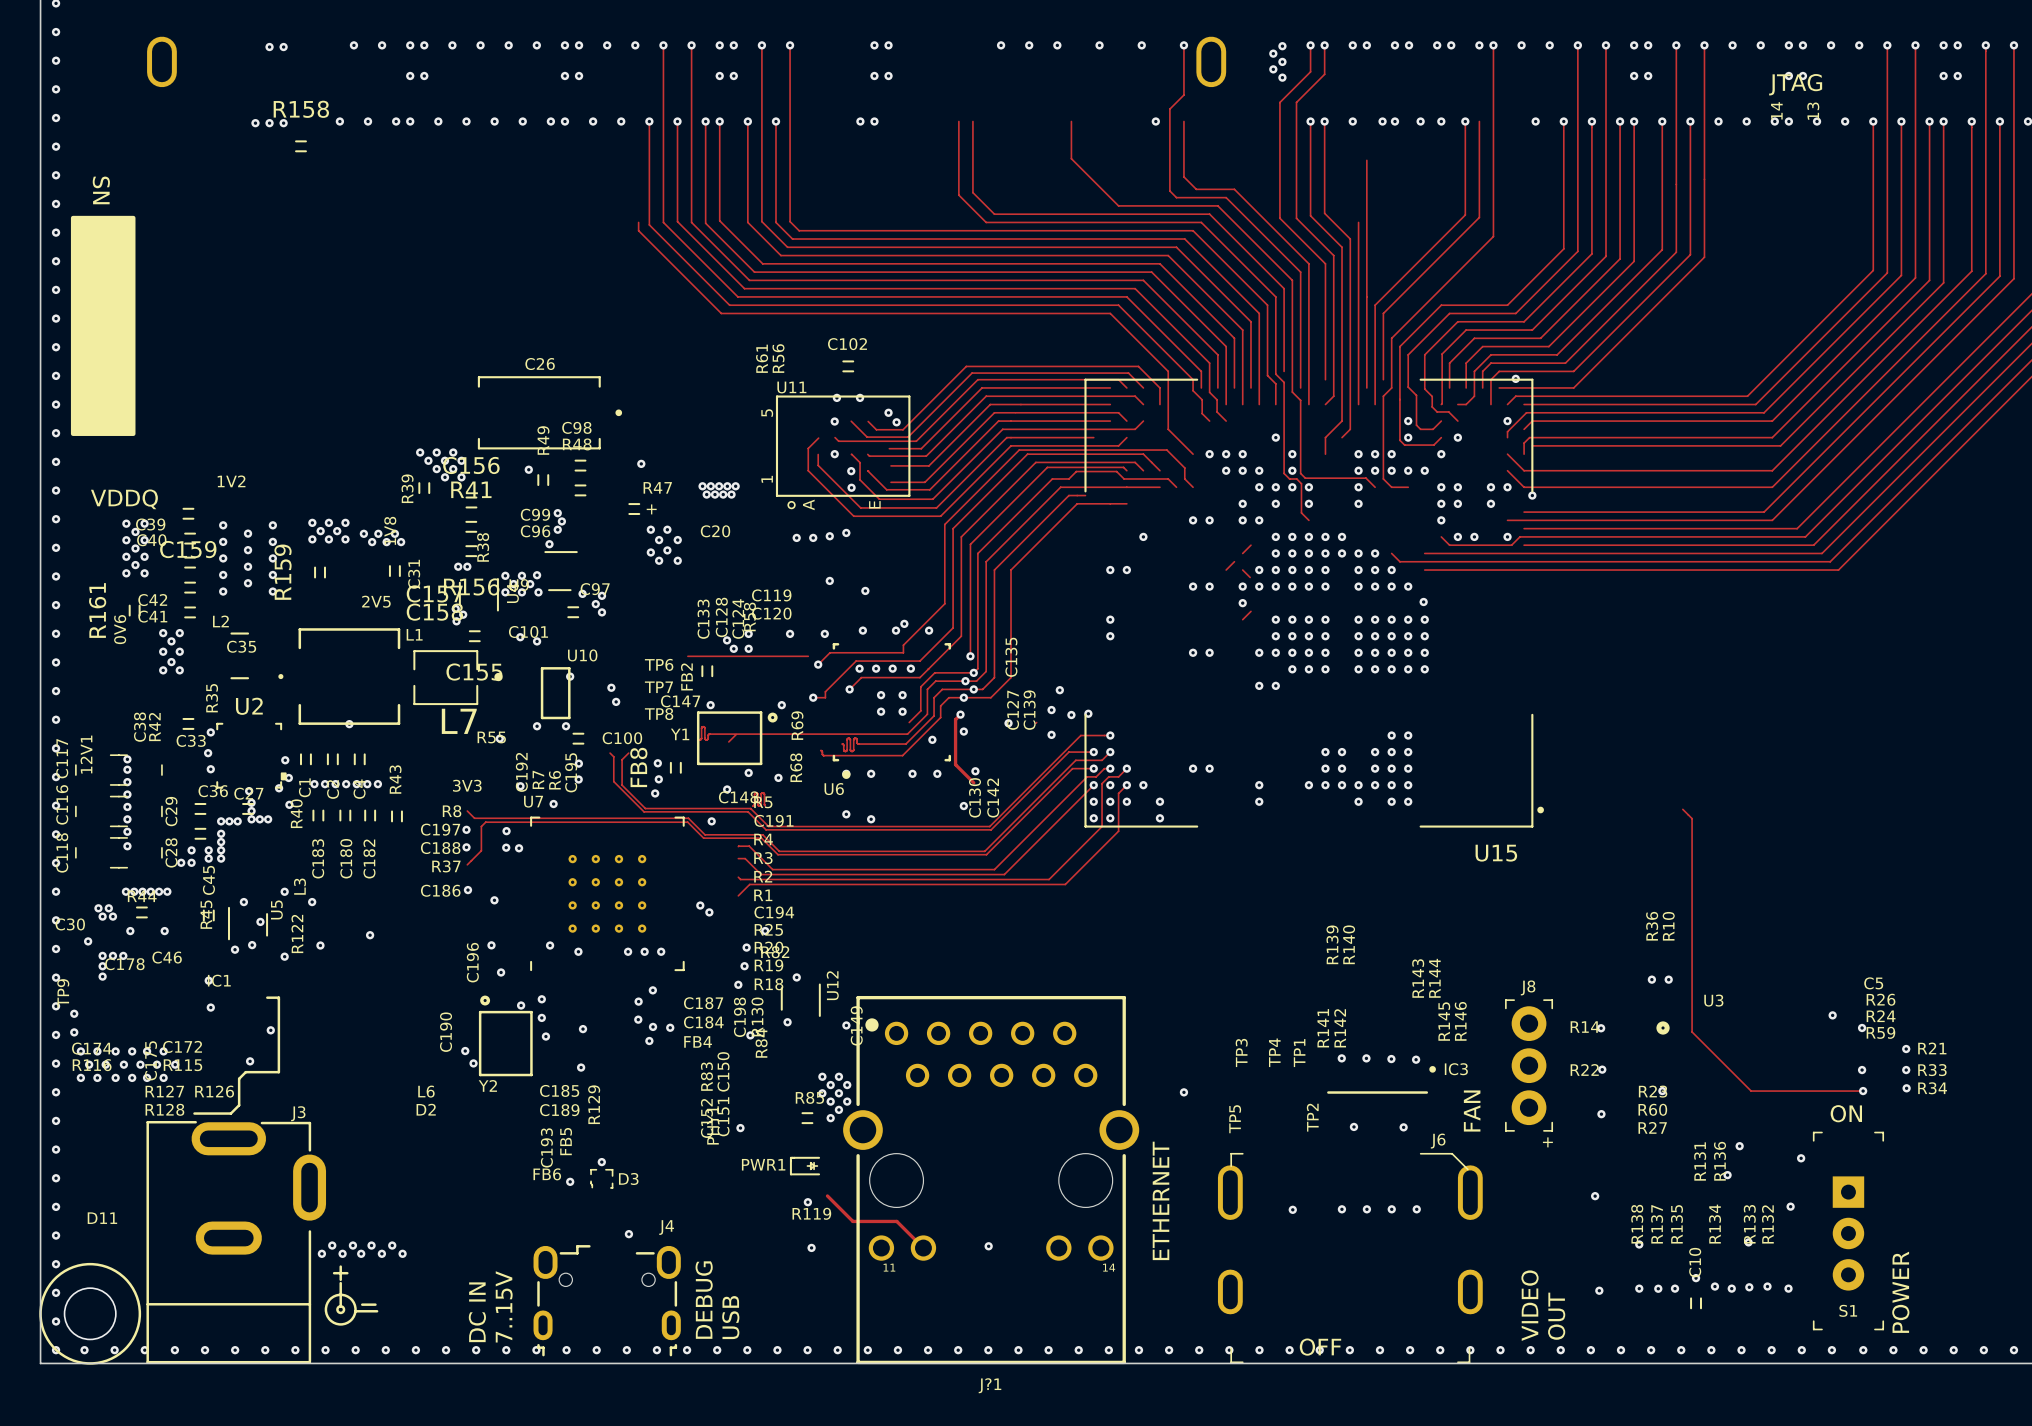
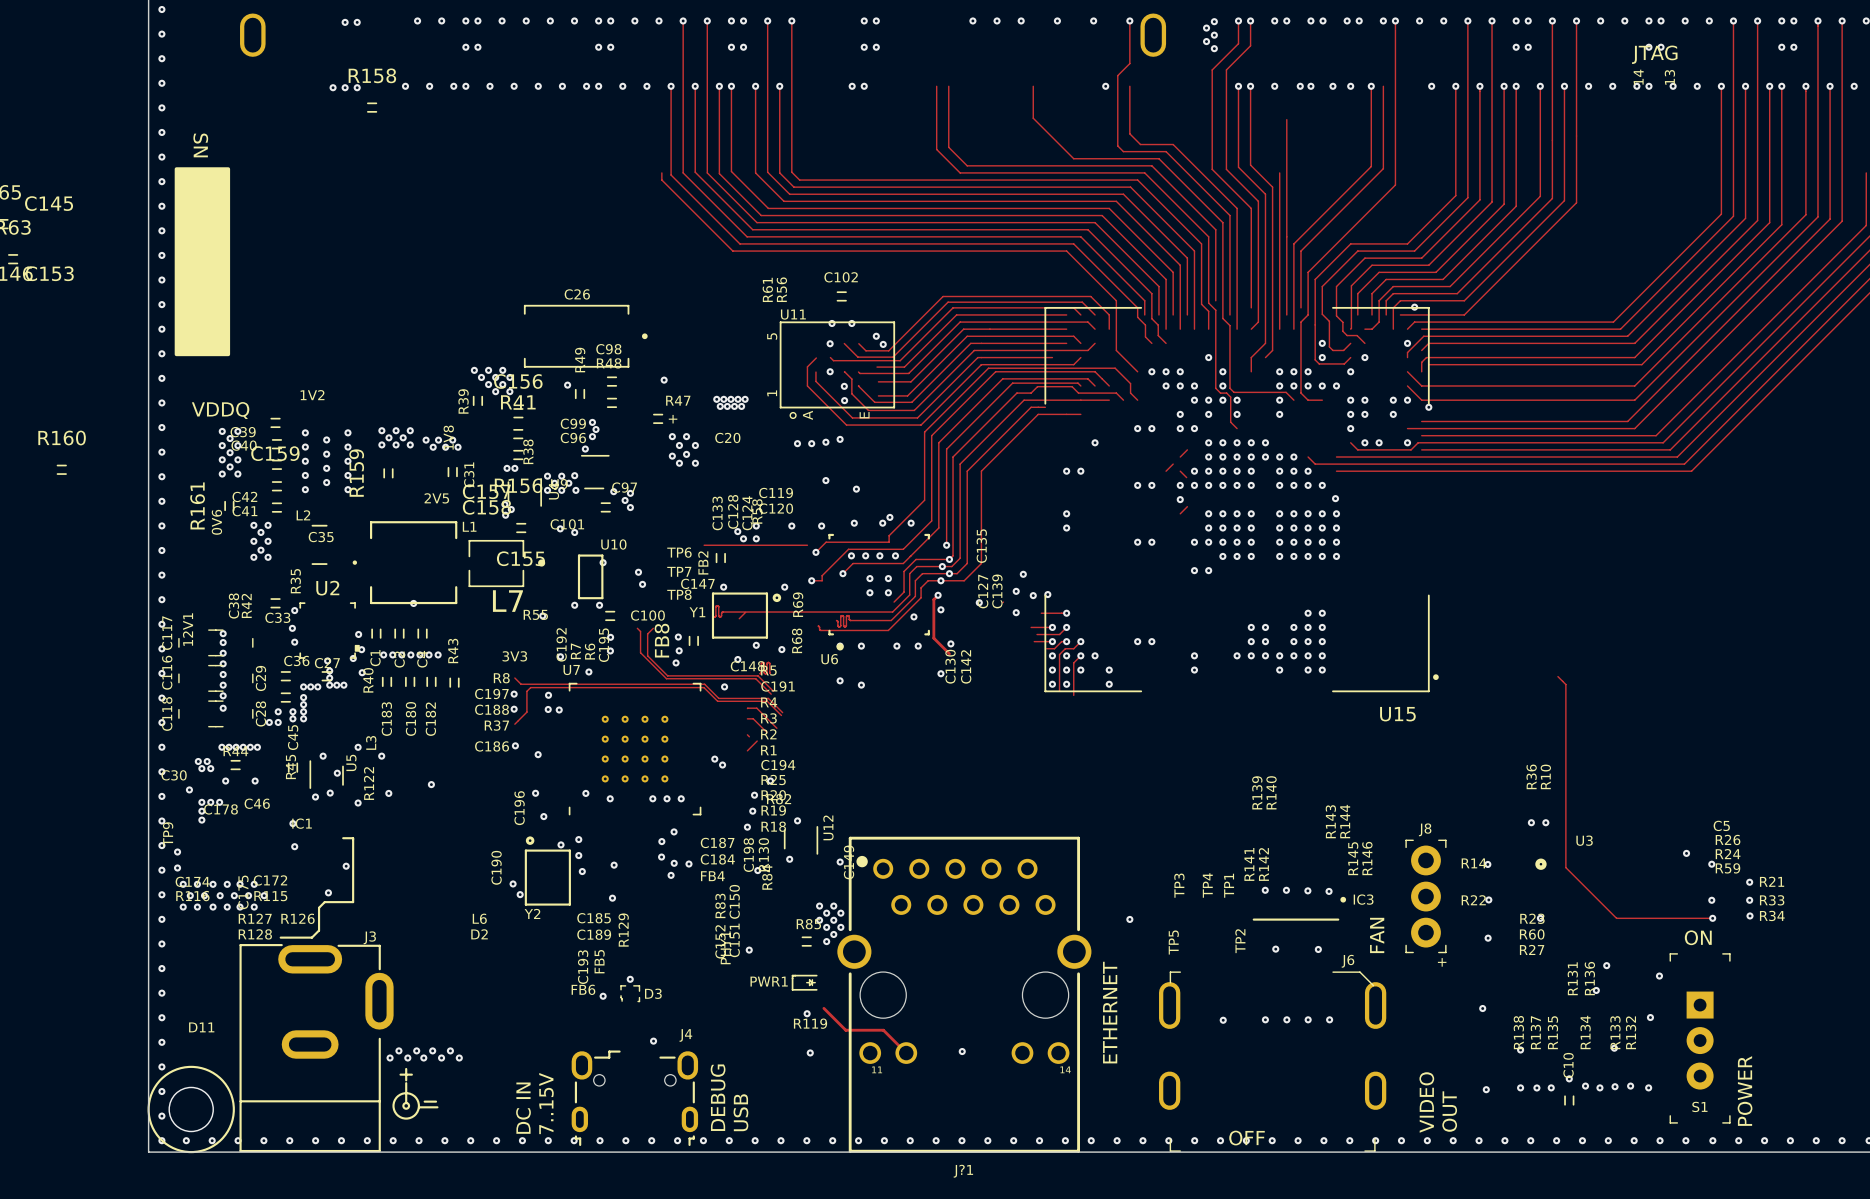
track: (1080, 735) (989, 826) (768, 826) -> none
track: (1068, 752) (991, 829) (766, 829) -> none
track: (1075, 760) (984, 851) (779, 851) -> none
track: (1072, 768) (986, 854) (777, 854) -> none
track: (1087, 776) (994, 869) (772, 869) -> none
track: (1093, 785) (1004, 874) (761, 874) -> none
track: (1102, 826) (1049, 879) (740, 879) -> none
track: (1118, 831) (1065, 884) (749, 884) -> none

